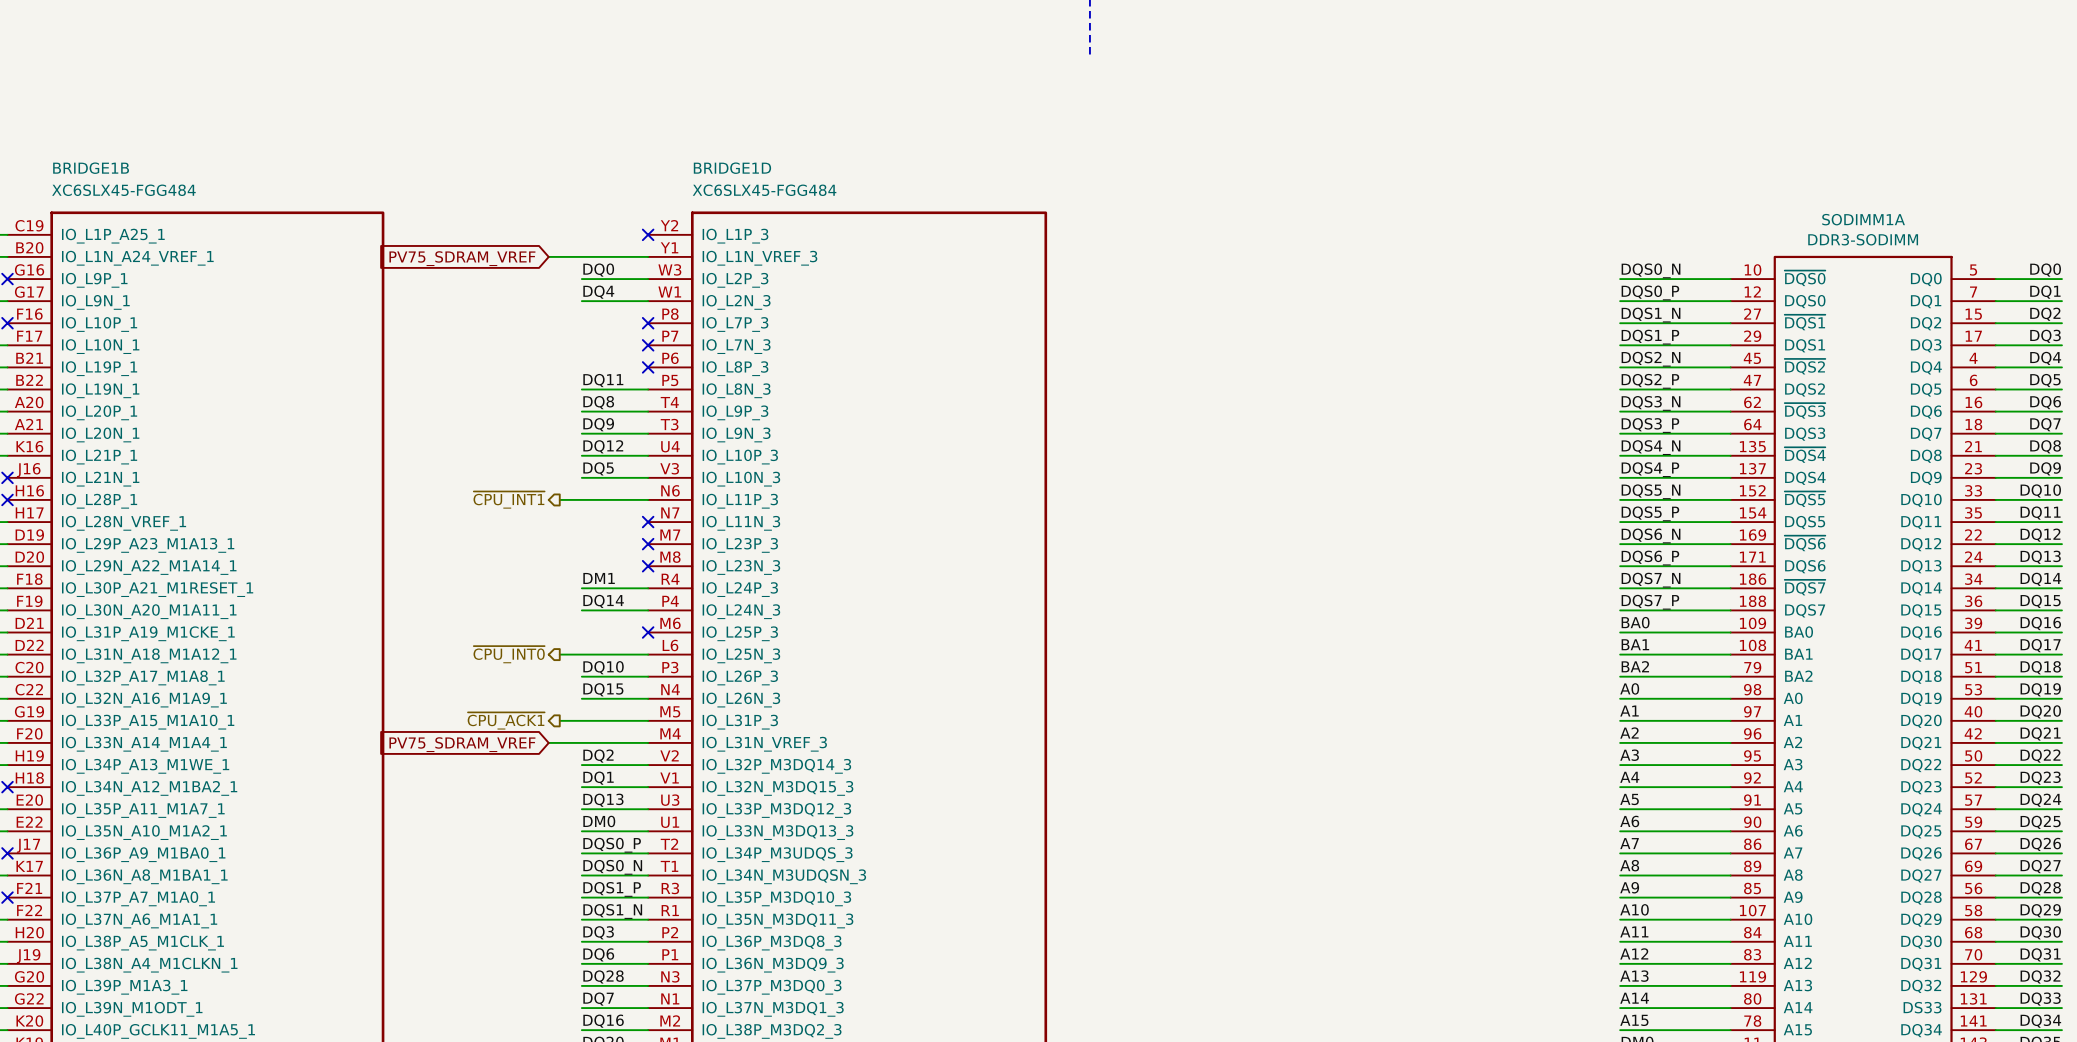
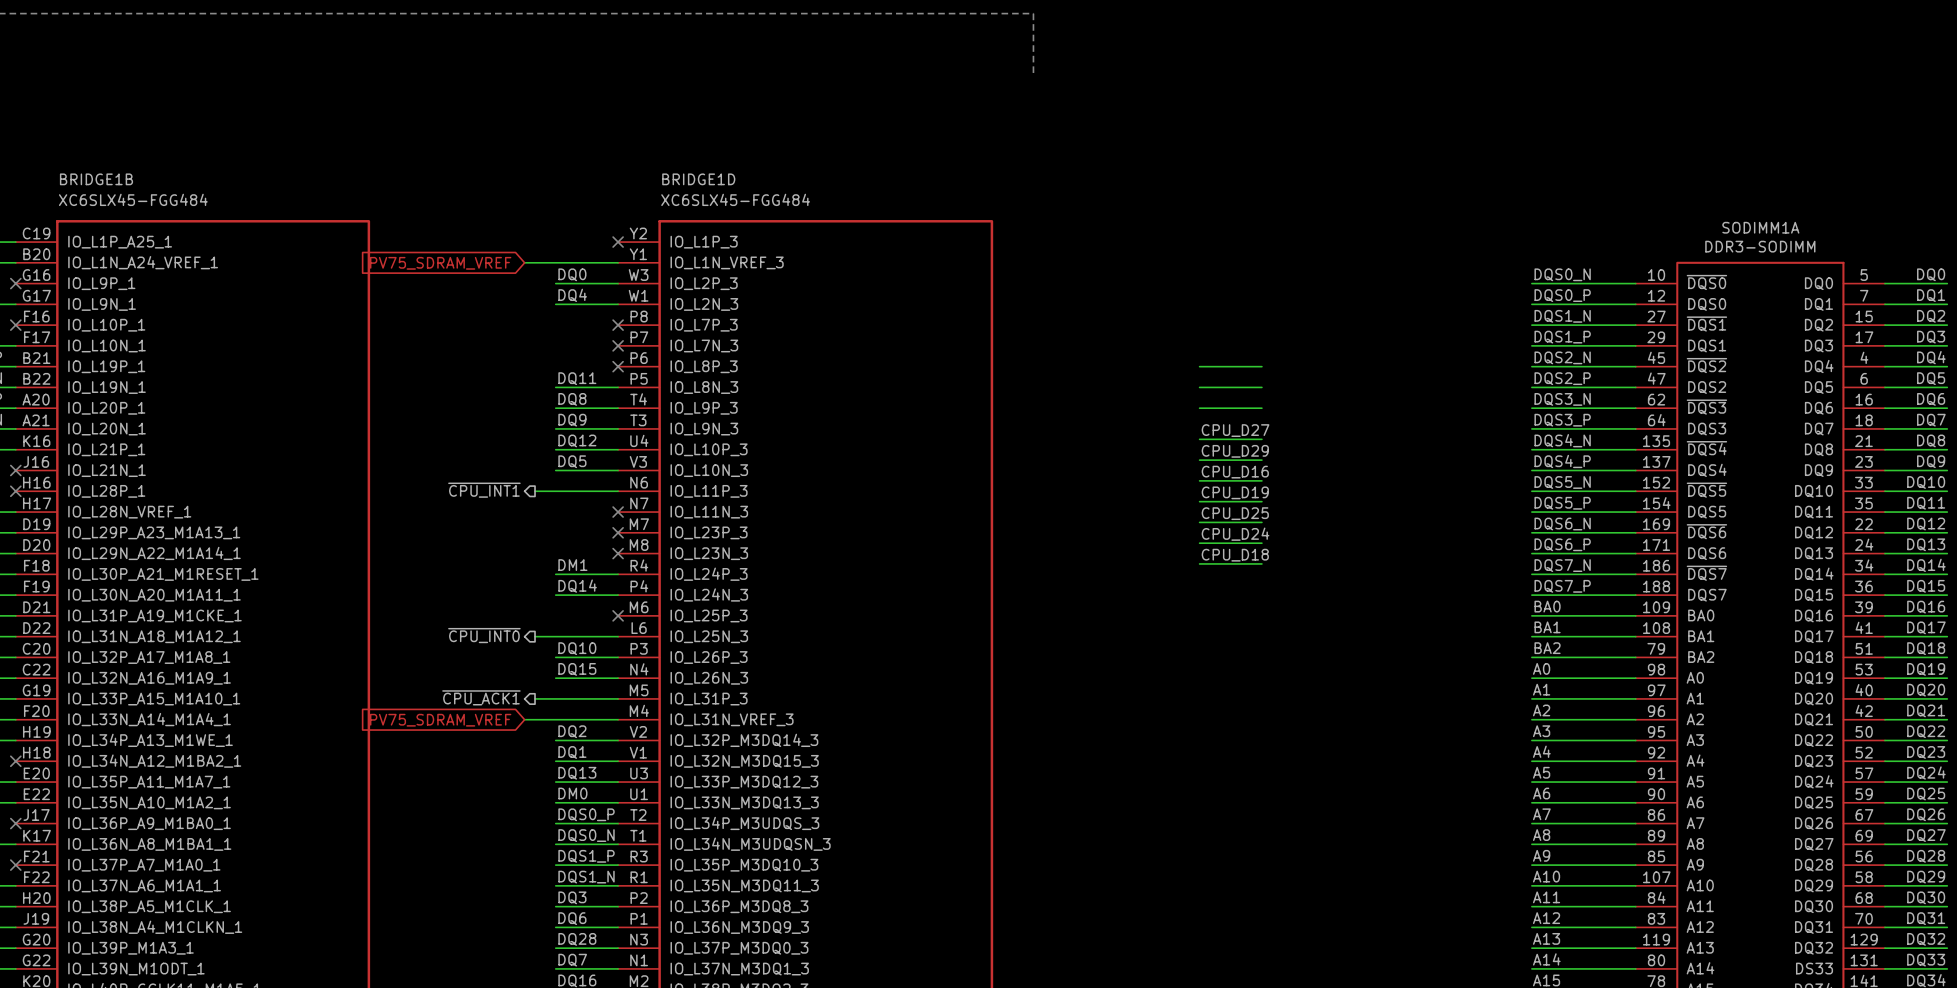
wire: none -> (1199, 366) (1261, 366)
wire: none -> (1199, 387) (1261, 387)
wire: none -> (1199, 408) (1261, 408)
label: none -> CPU_D27 (1235, 430)
wire: none -> (1199, 439) (1261, 439)
label: none -> CPU_D29 (1235, 451)
wire: none -> (1199, 460) (1261, 460)
label: none -> CPU_D16 (1235, 472)
wire: none -> (1199, 480) (1261, 480)
label: none -> CPU_D19 (1235, 492)
wire: none -> (1199, 501) (1261, 501)
label: none -> CPU_D25 (1235, 513)
wire: none -> (1199, 522) (1261, 522)
label: none -> CPU_D24 (1235, 534)
wire: none -> (1199, 543) (1261, 543)
label: none -> CPU_D18 (1235, 555)
wire: none -> (1199, 563) (1261, 563)

